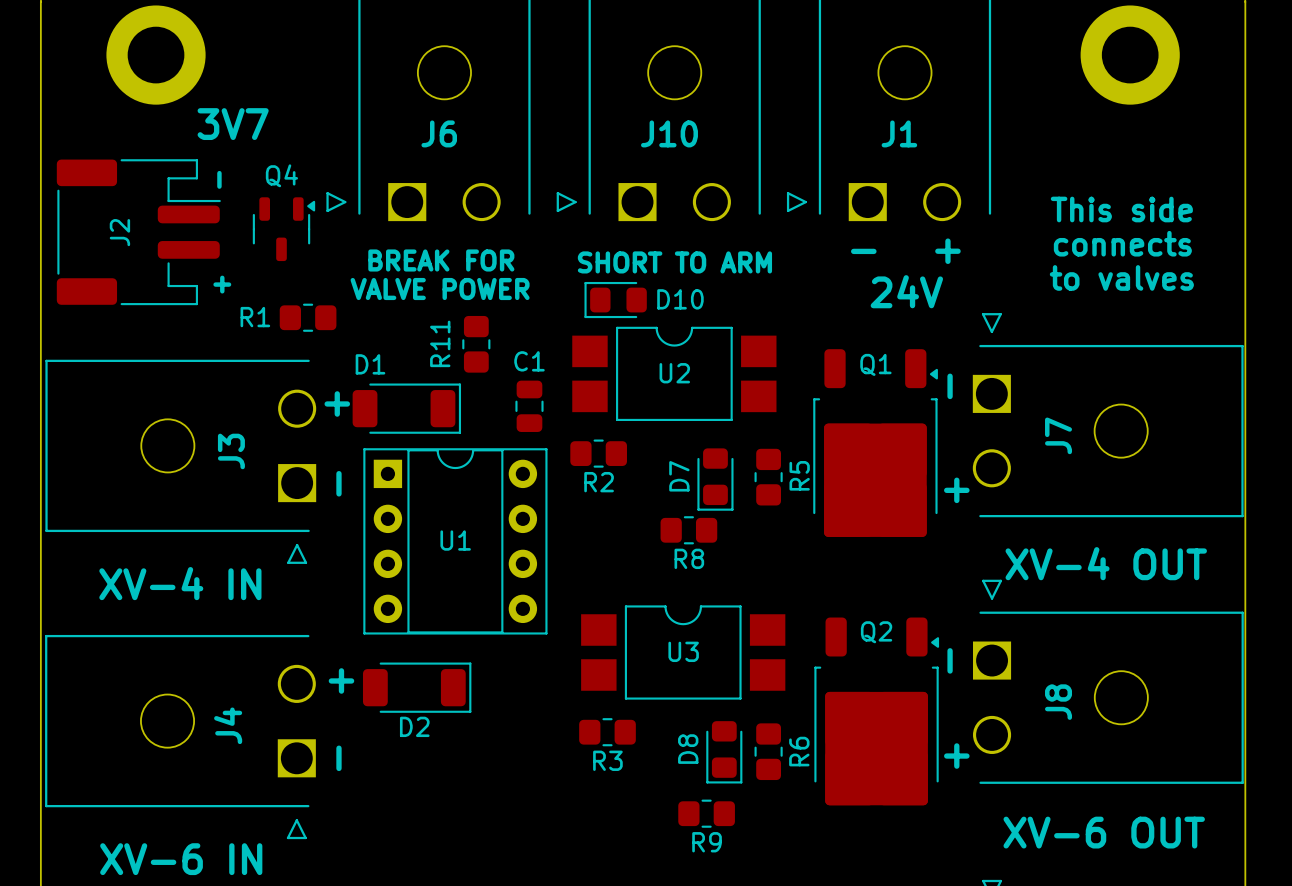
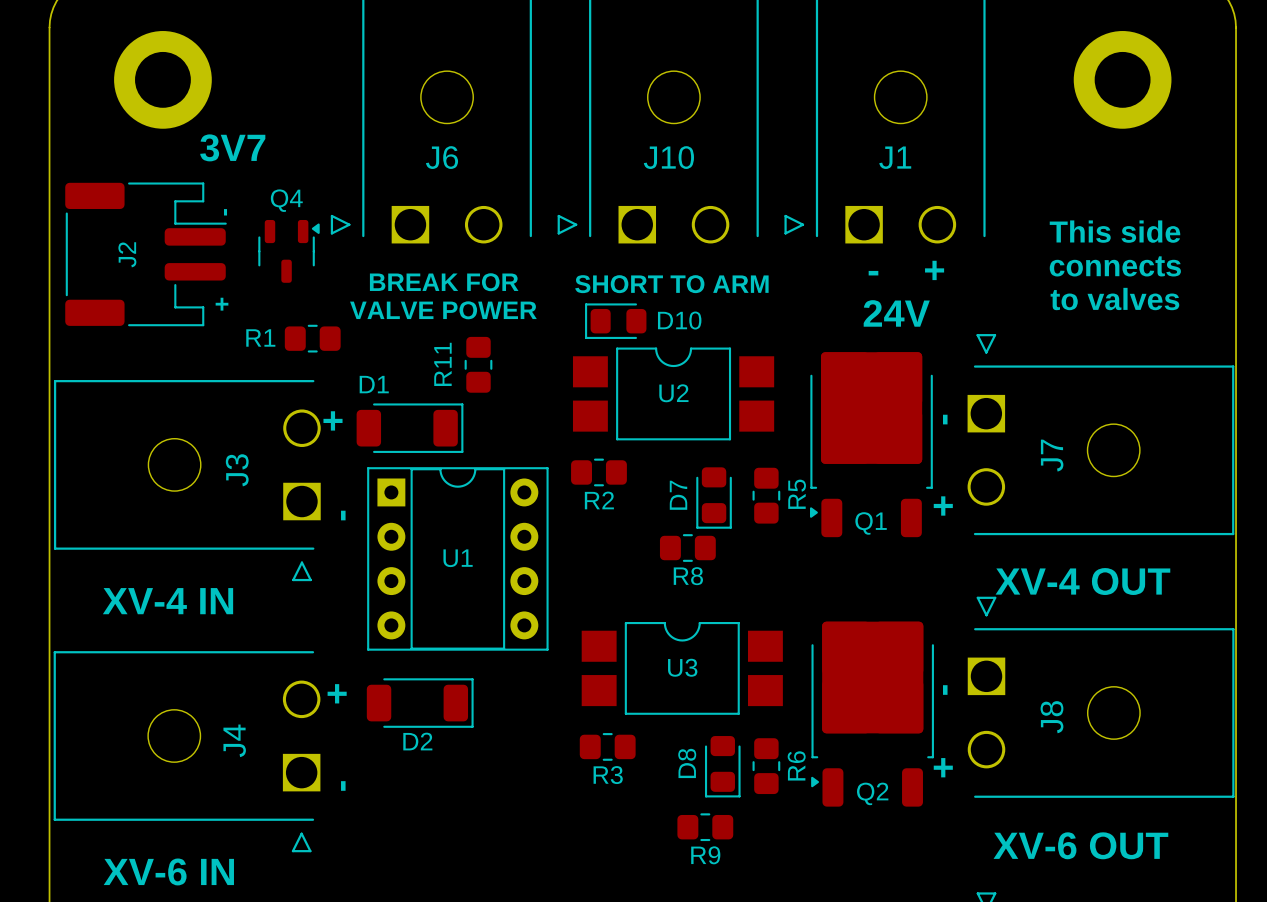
C1: (529, 406) -> none
Q1 rotation: 0° (875, 443) -> 180° (871, 444)
Q2 rotation: 0° (876, 711) -> 180° (872, 714)

